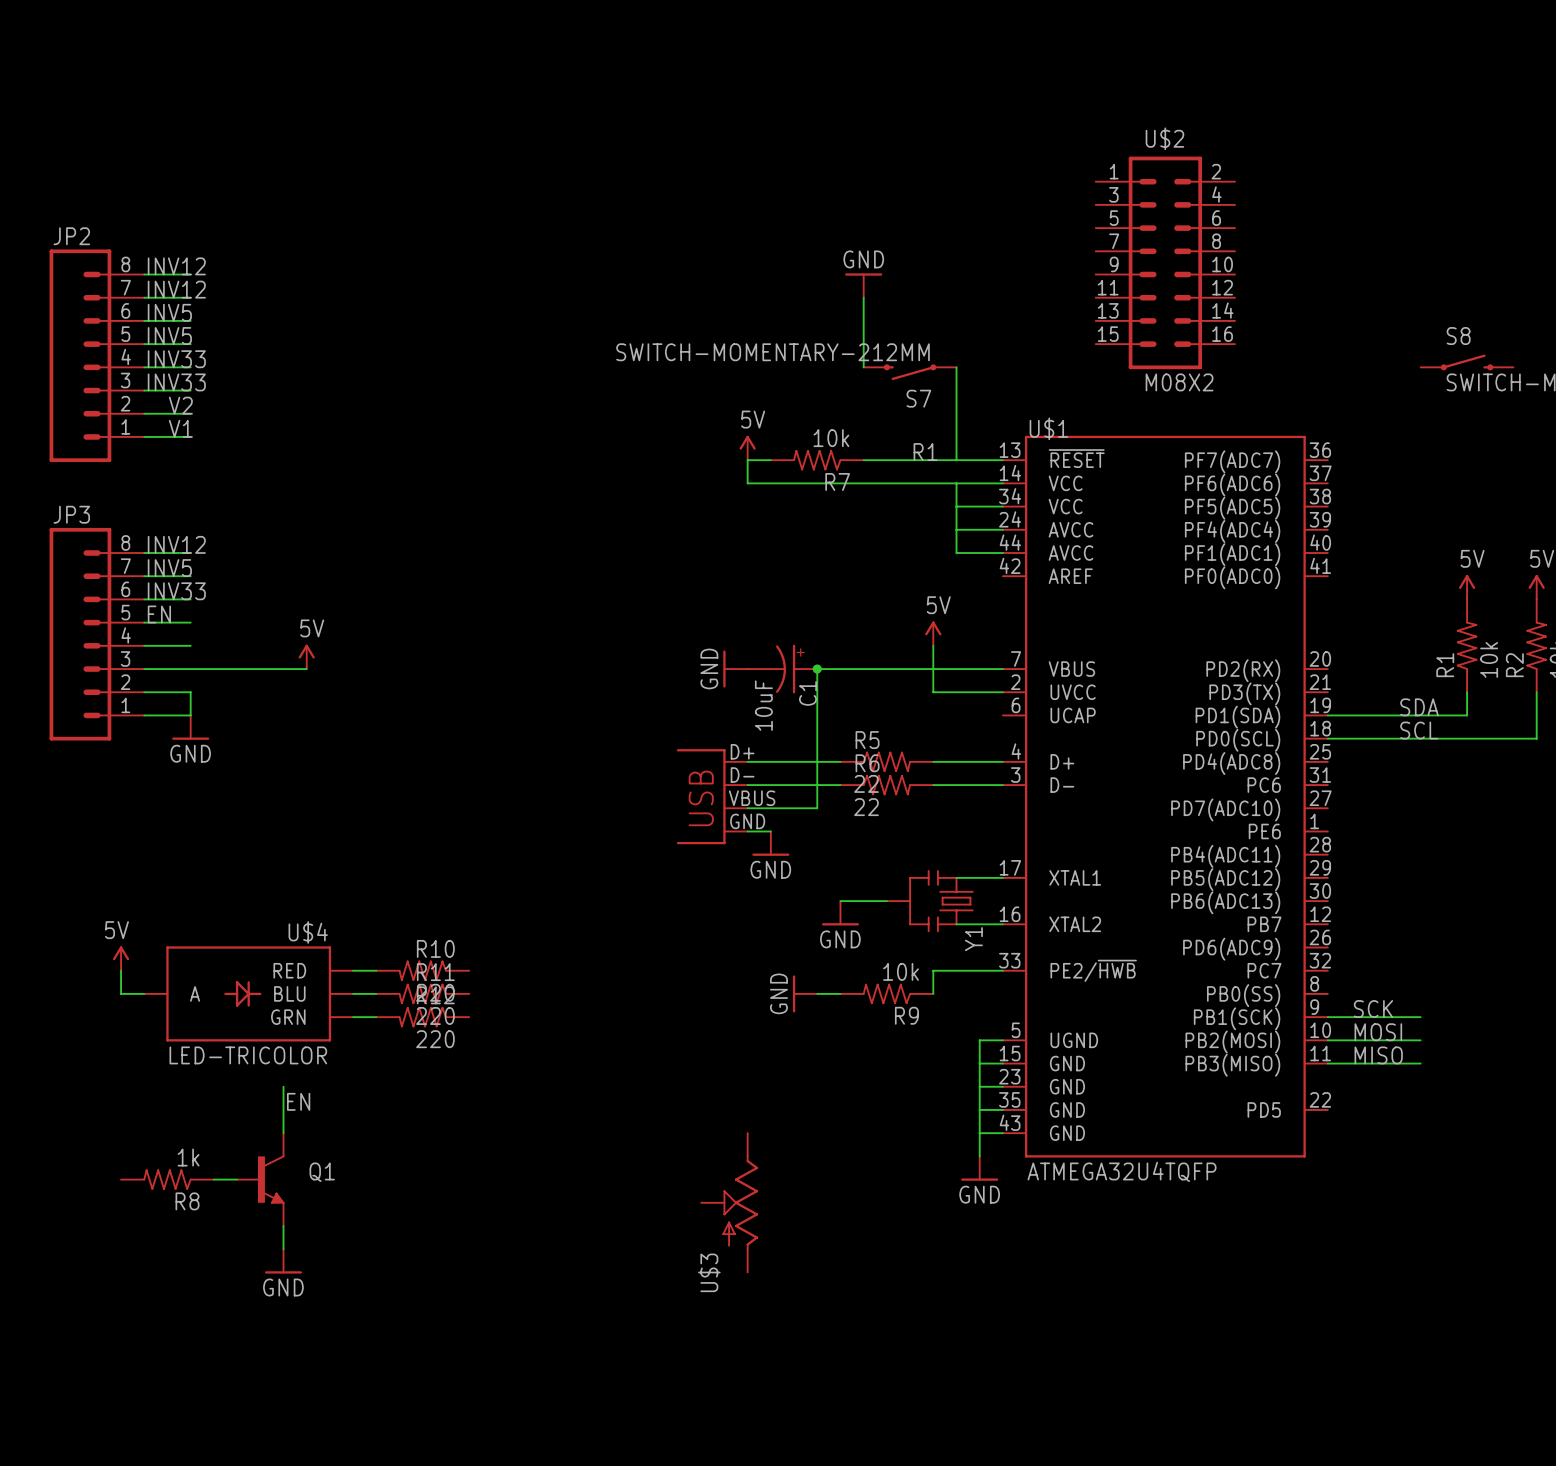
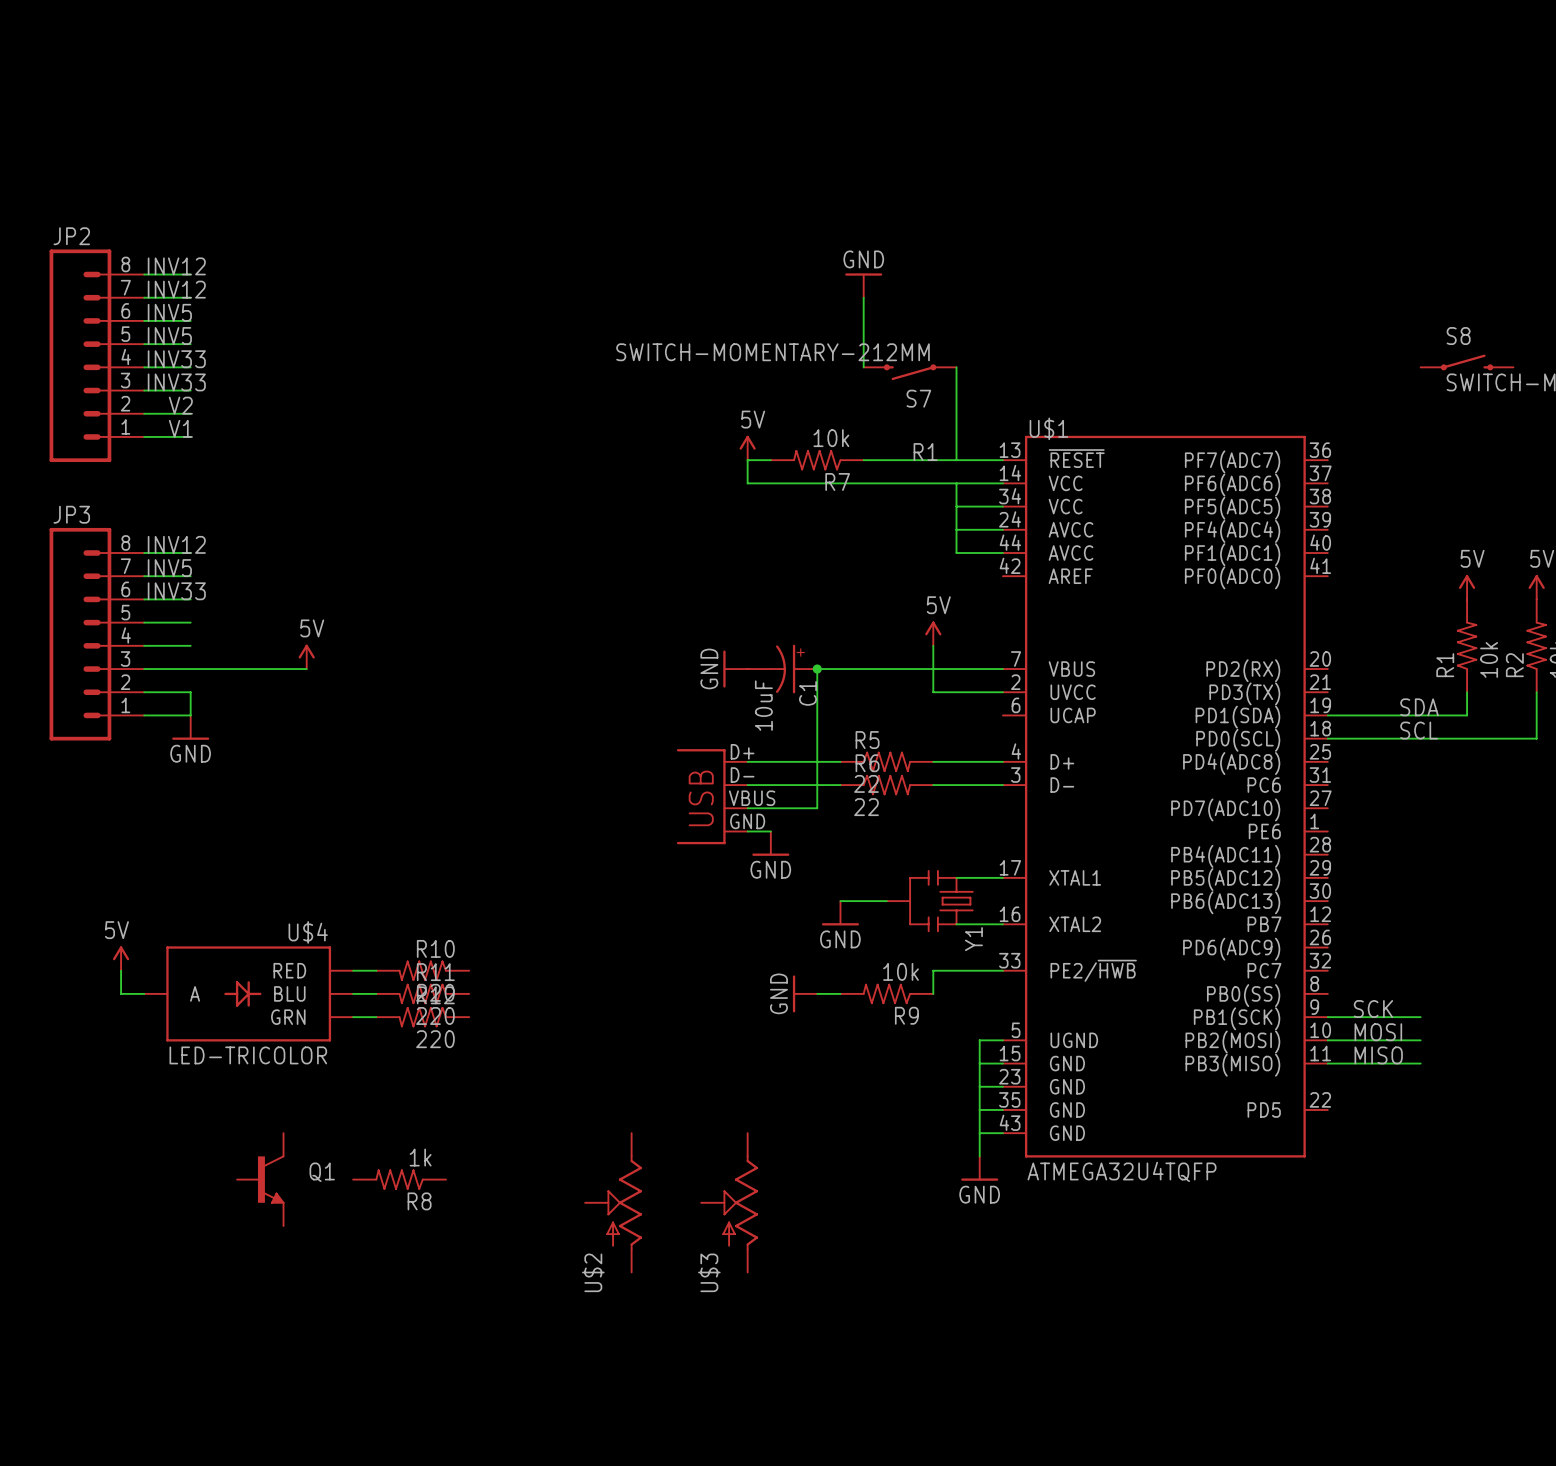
U$2 name position: U$2 (1164, 138) -> U$2 (593, 1272)
U$2 symbol: [1095, 156, 1235, 370] -> [585, 1133, 643, 1273]
U$2 value: M08X2 (1179, 382) -> none
label: EN (159, 614) -> none
wire: (283, 1086) (283, 1133) -> none
label: EN (298, 1101) -> none
R8 position: (167, 1179) -> (399, 1179)
wire: (213, 1179) (237, 1179) -> none
wire: (283, 1226) (283, 1249) -> none
power symbol: GND (283, 1261) -> none

